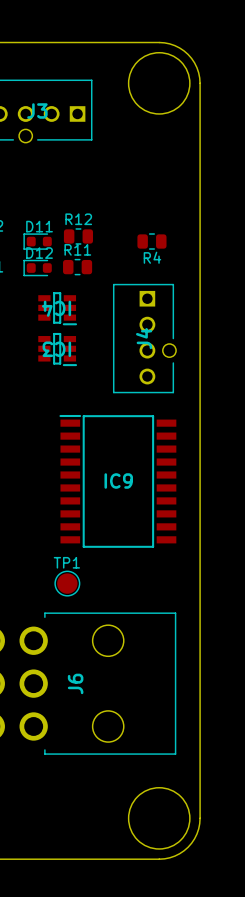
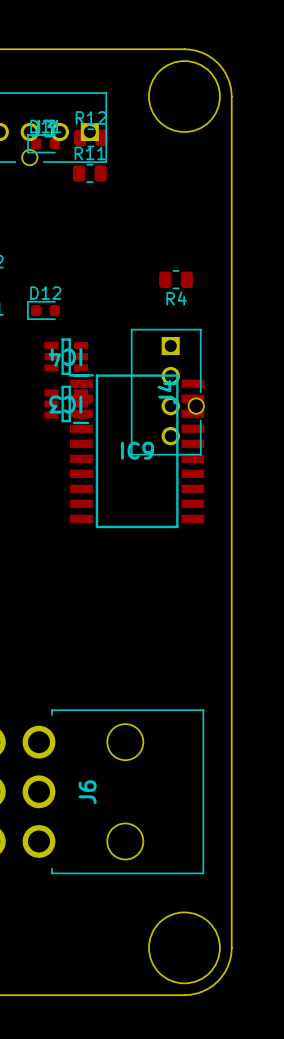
R12 position: (78, 236) -> (90, 137)
D11 position: (37, 241) -> (43, 143)
R11 position: (77, 267) -> (89, 173)
IC9 position: (117, 481) -> (136, 451)
TP1: (67, 583) -> none

